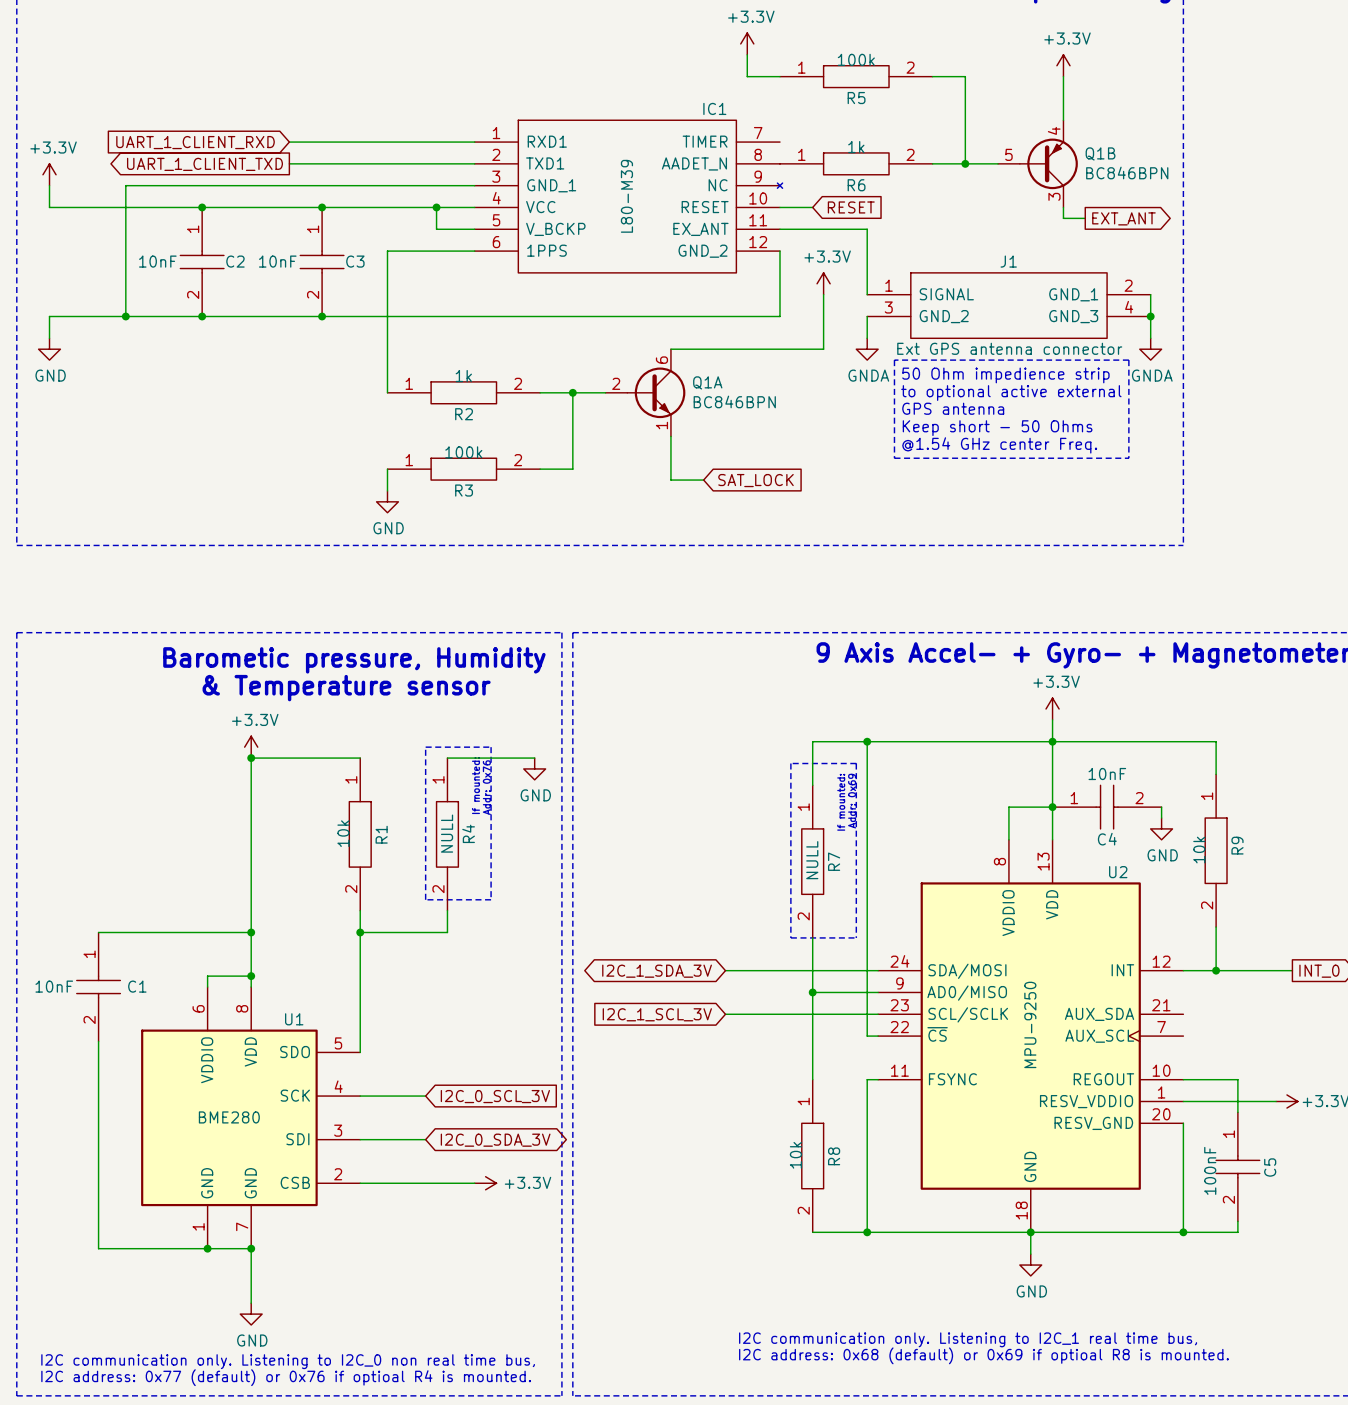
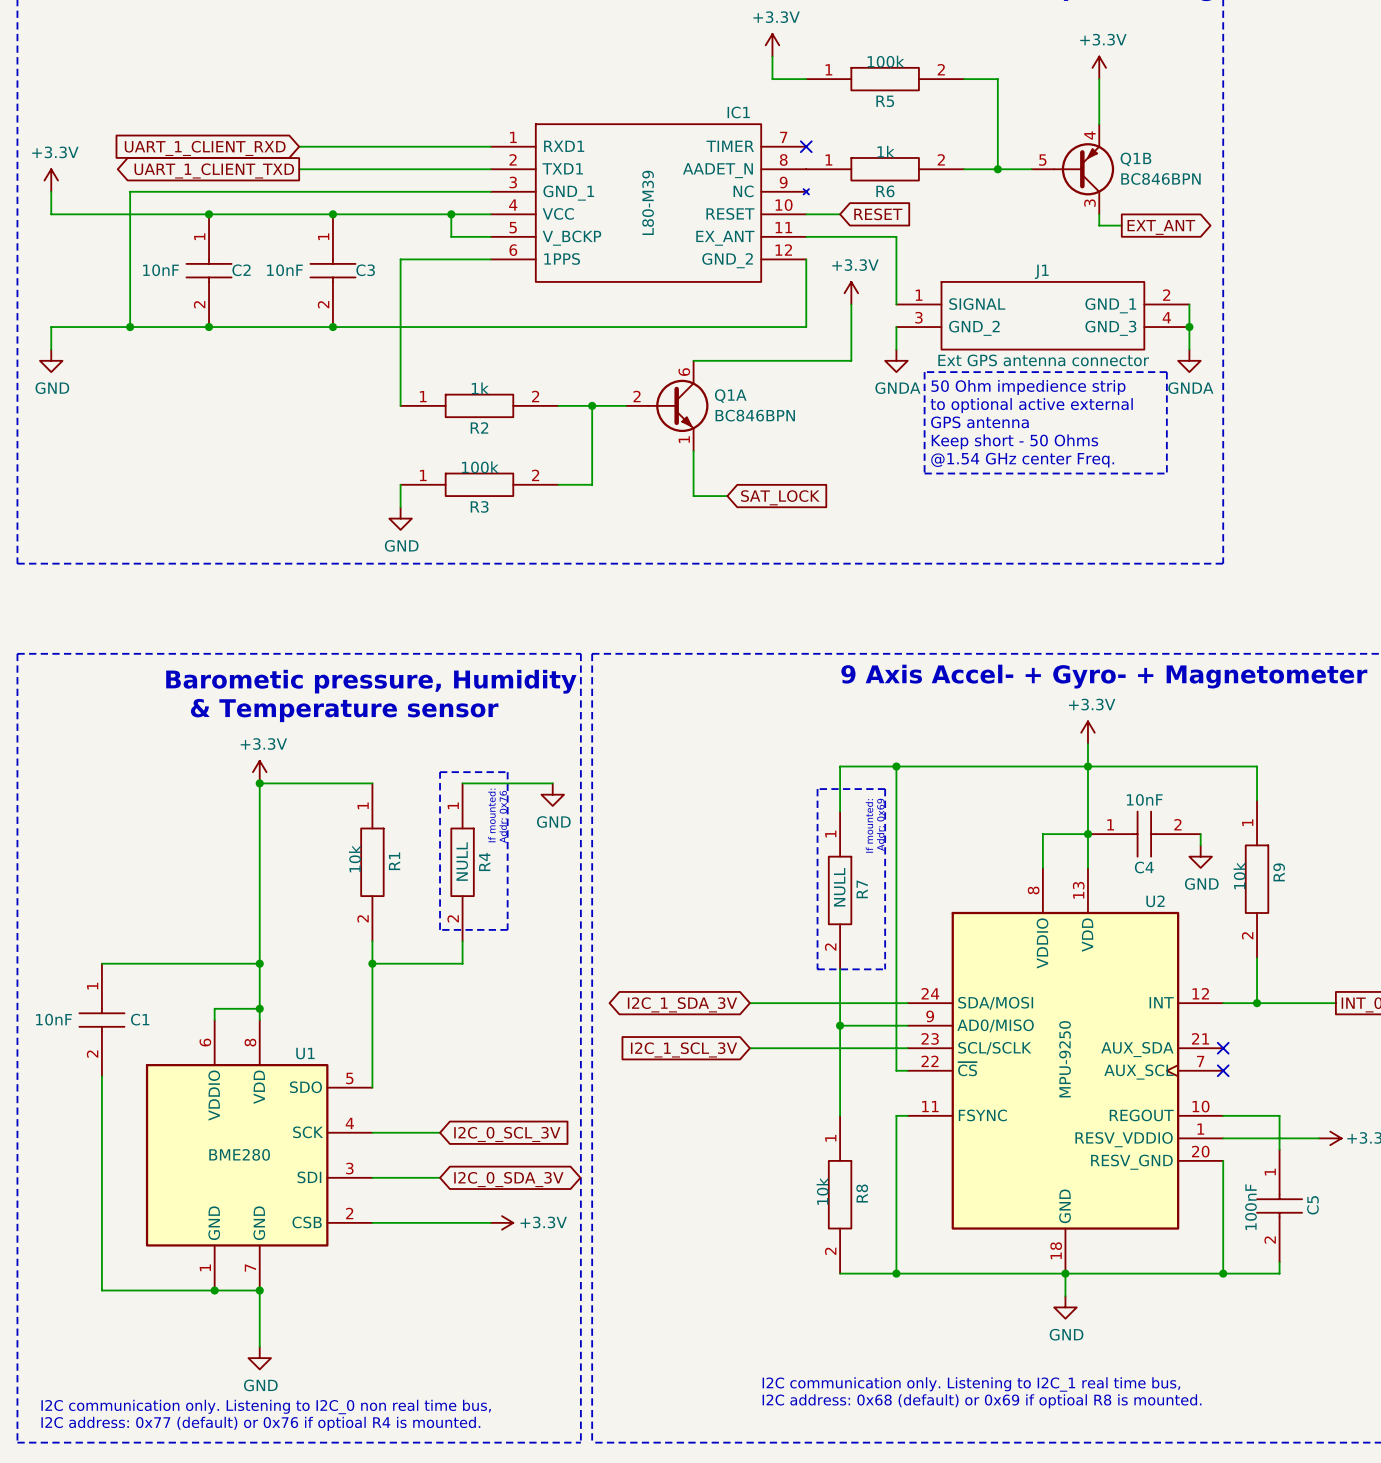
no-connect mark: none -> (806, 146)
no-connect mark: none -> (1223, 1048)
no-connect mark: none -> (1223, 1070)

